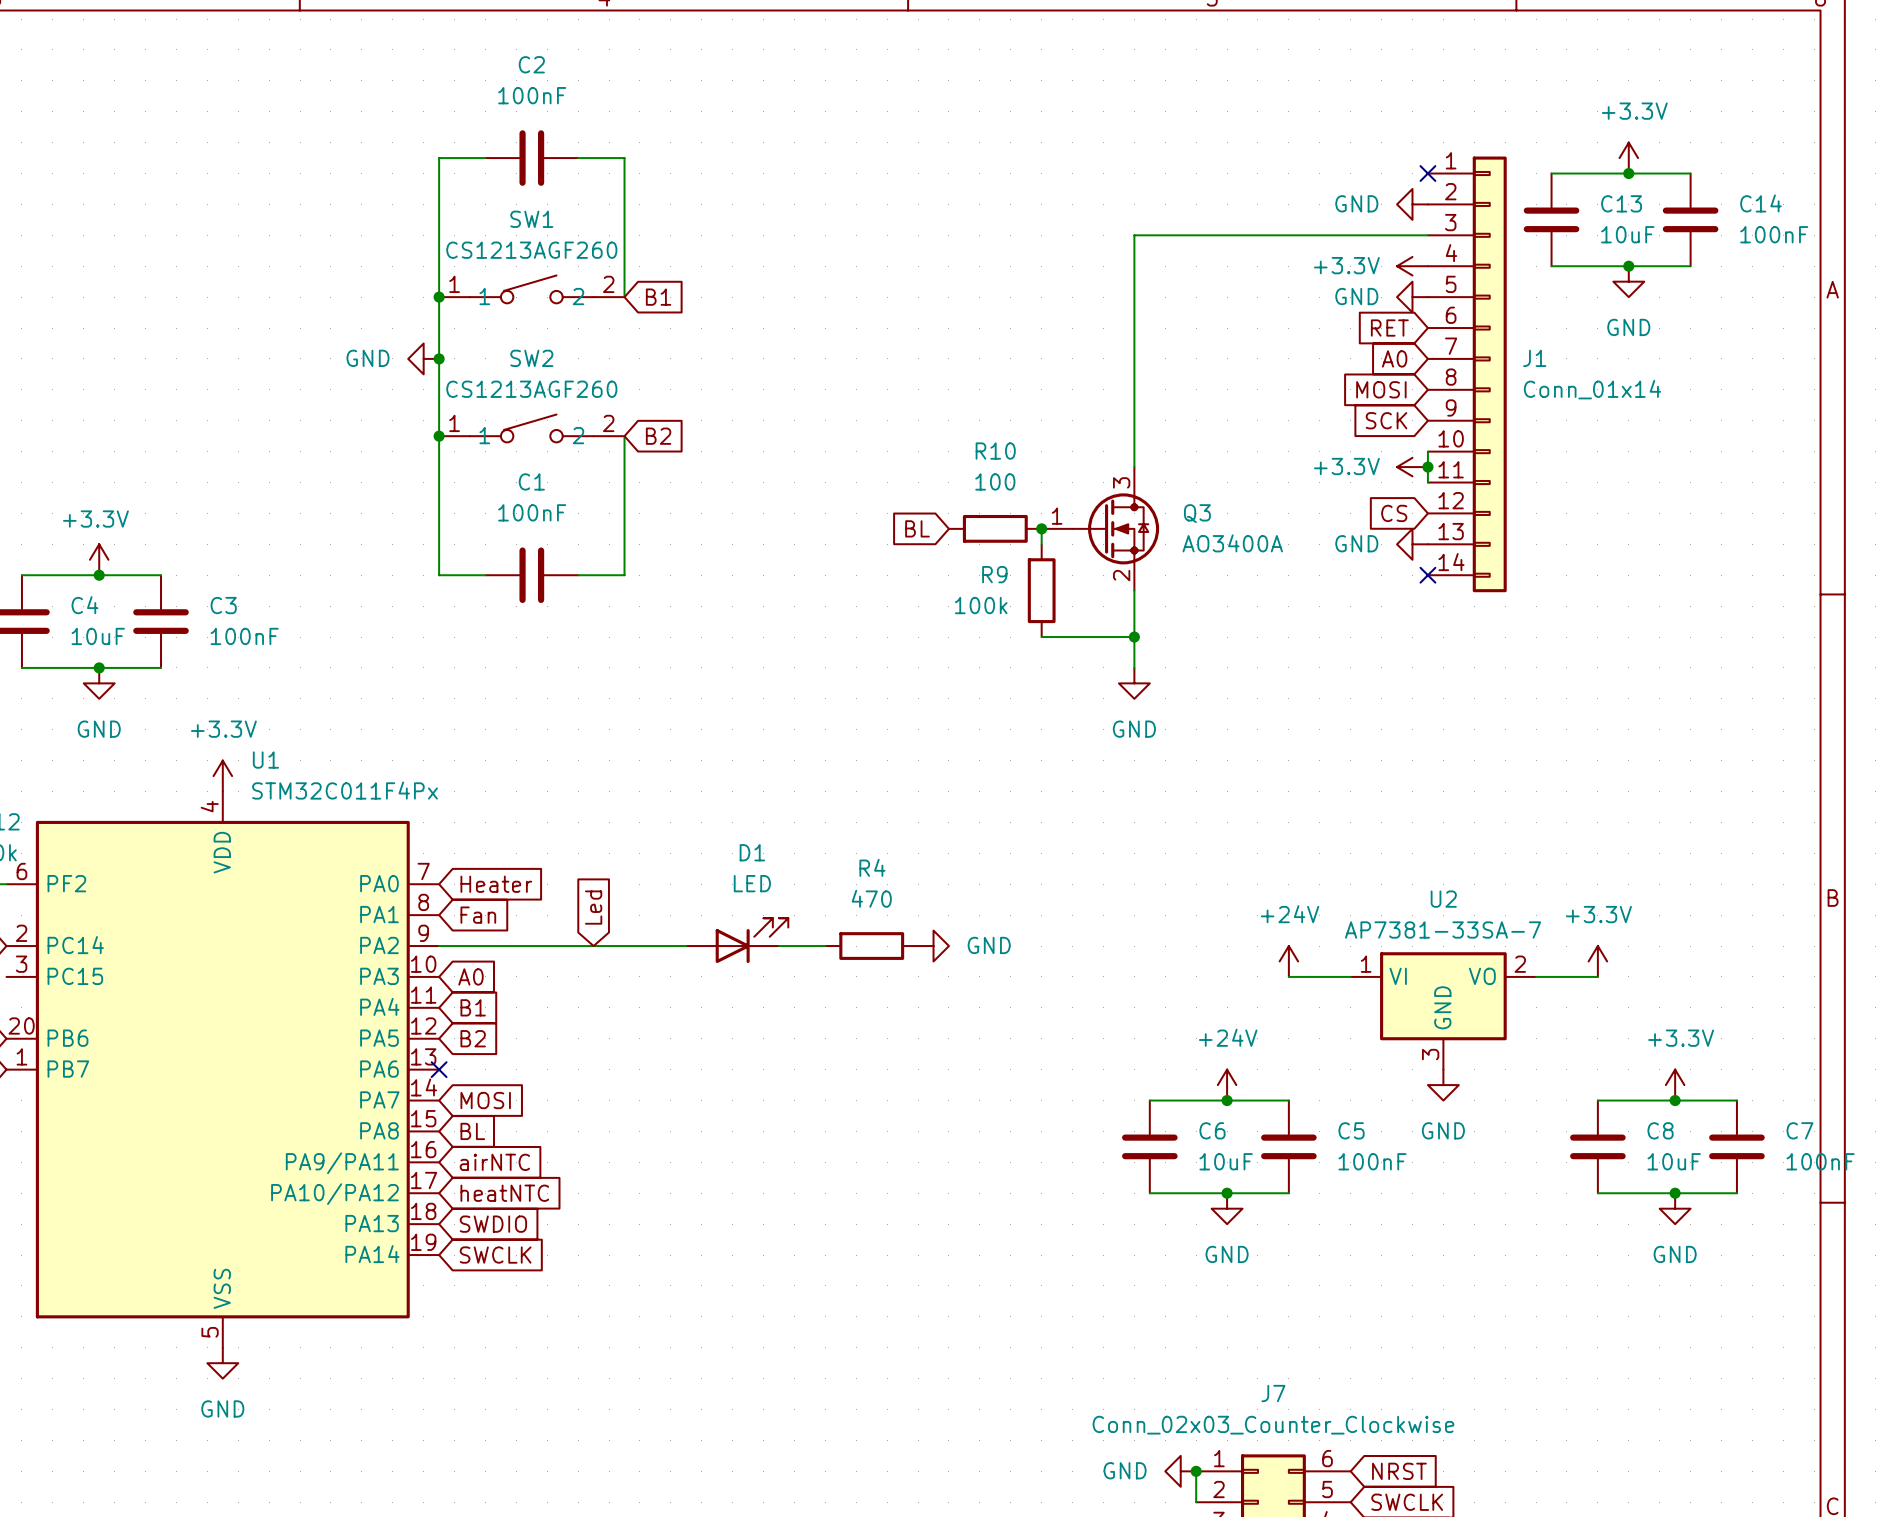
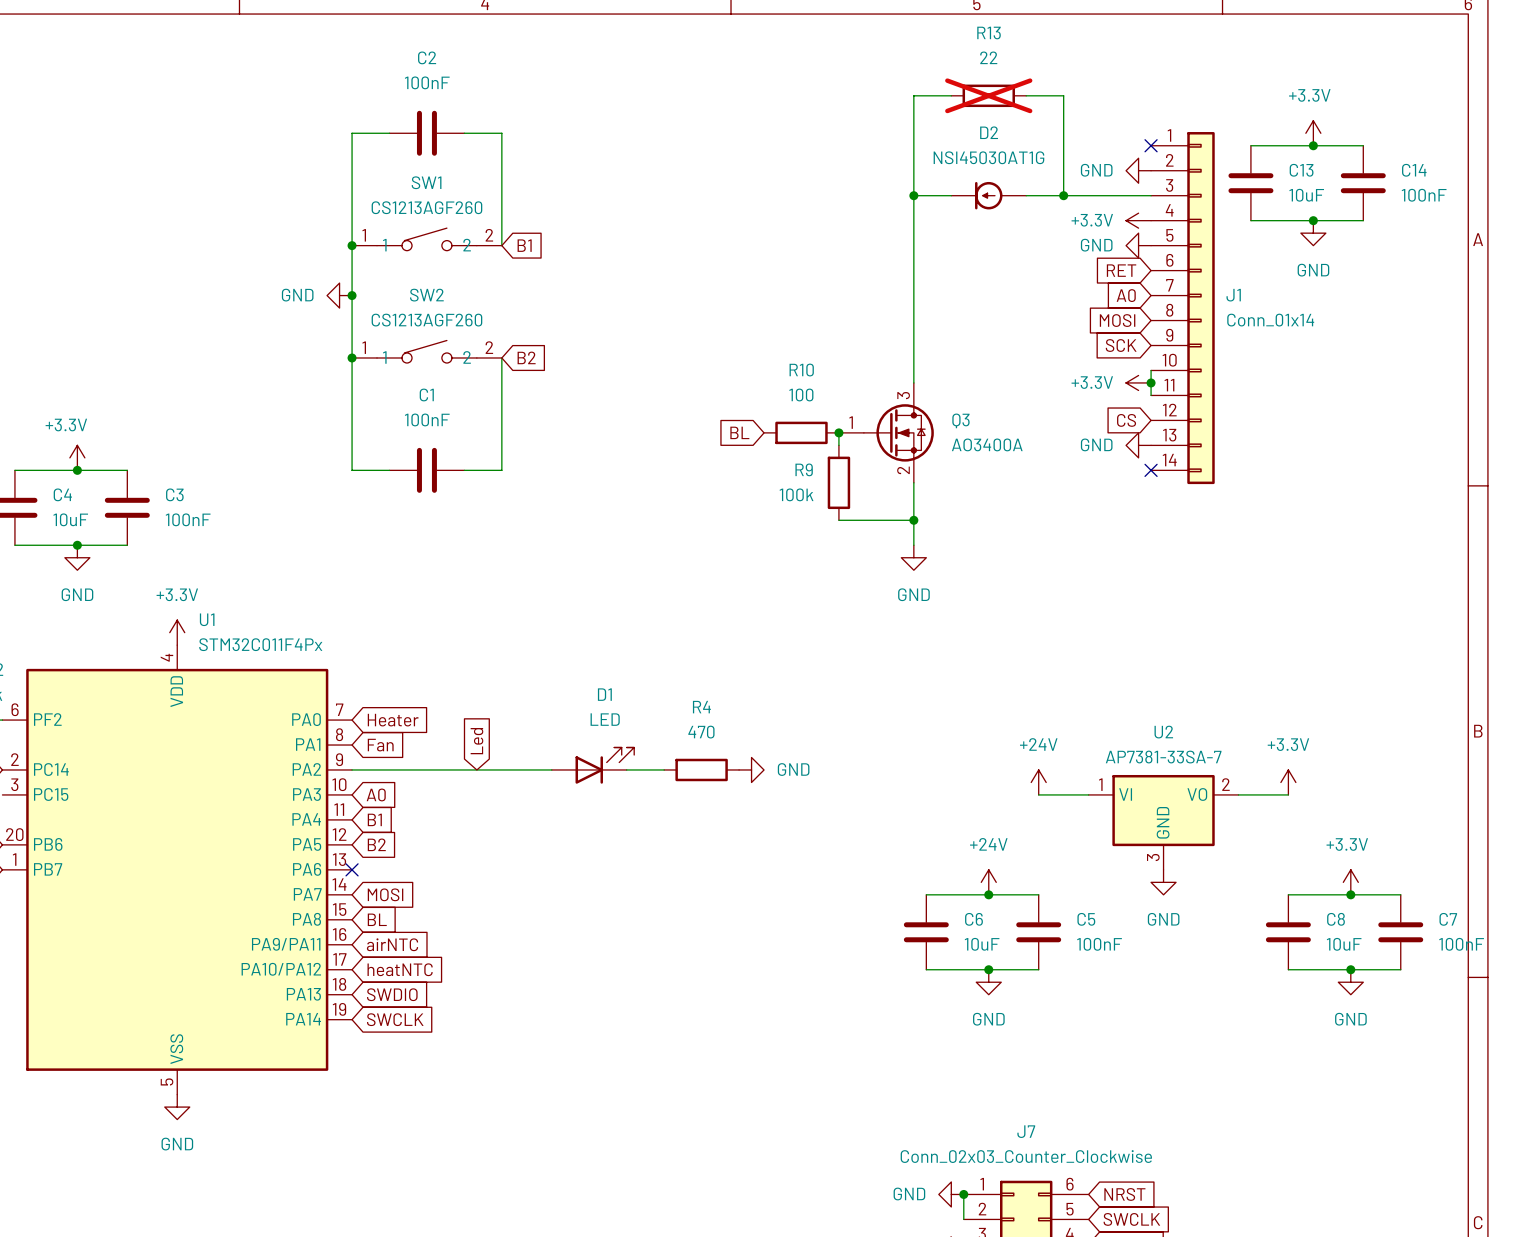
wire: none -> (951, 95) (913, 95) (913, 195)
R13: none -> 22 (988, 95)
wire: none -> (1026, 95) (1063, 95) (1063, 195)
junction: none -> (913, 195)
D2: none -> NSI45030AT1G (988, 195)
junction: none -> (1063, 195)

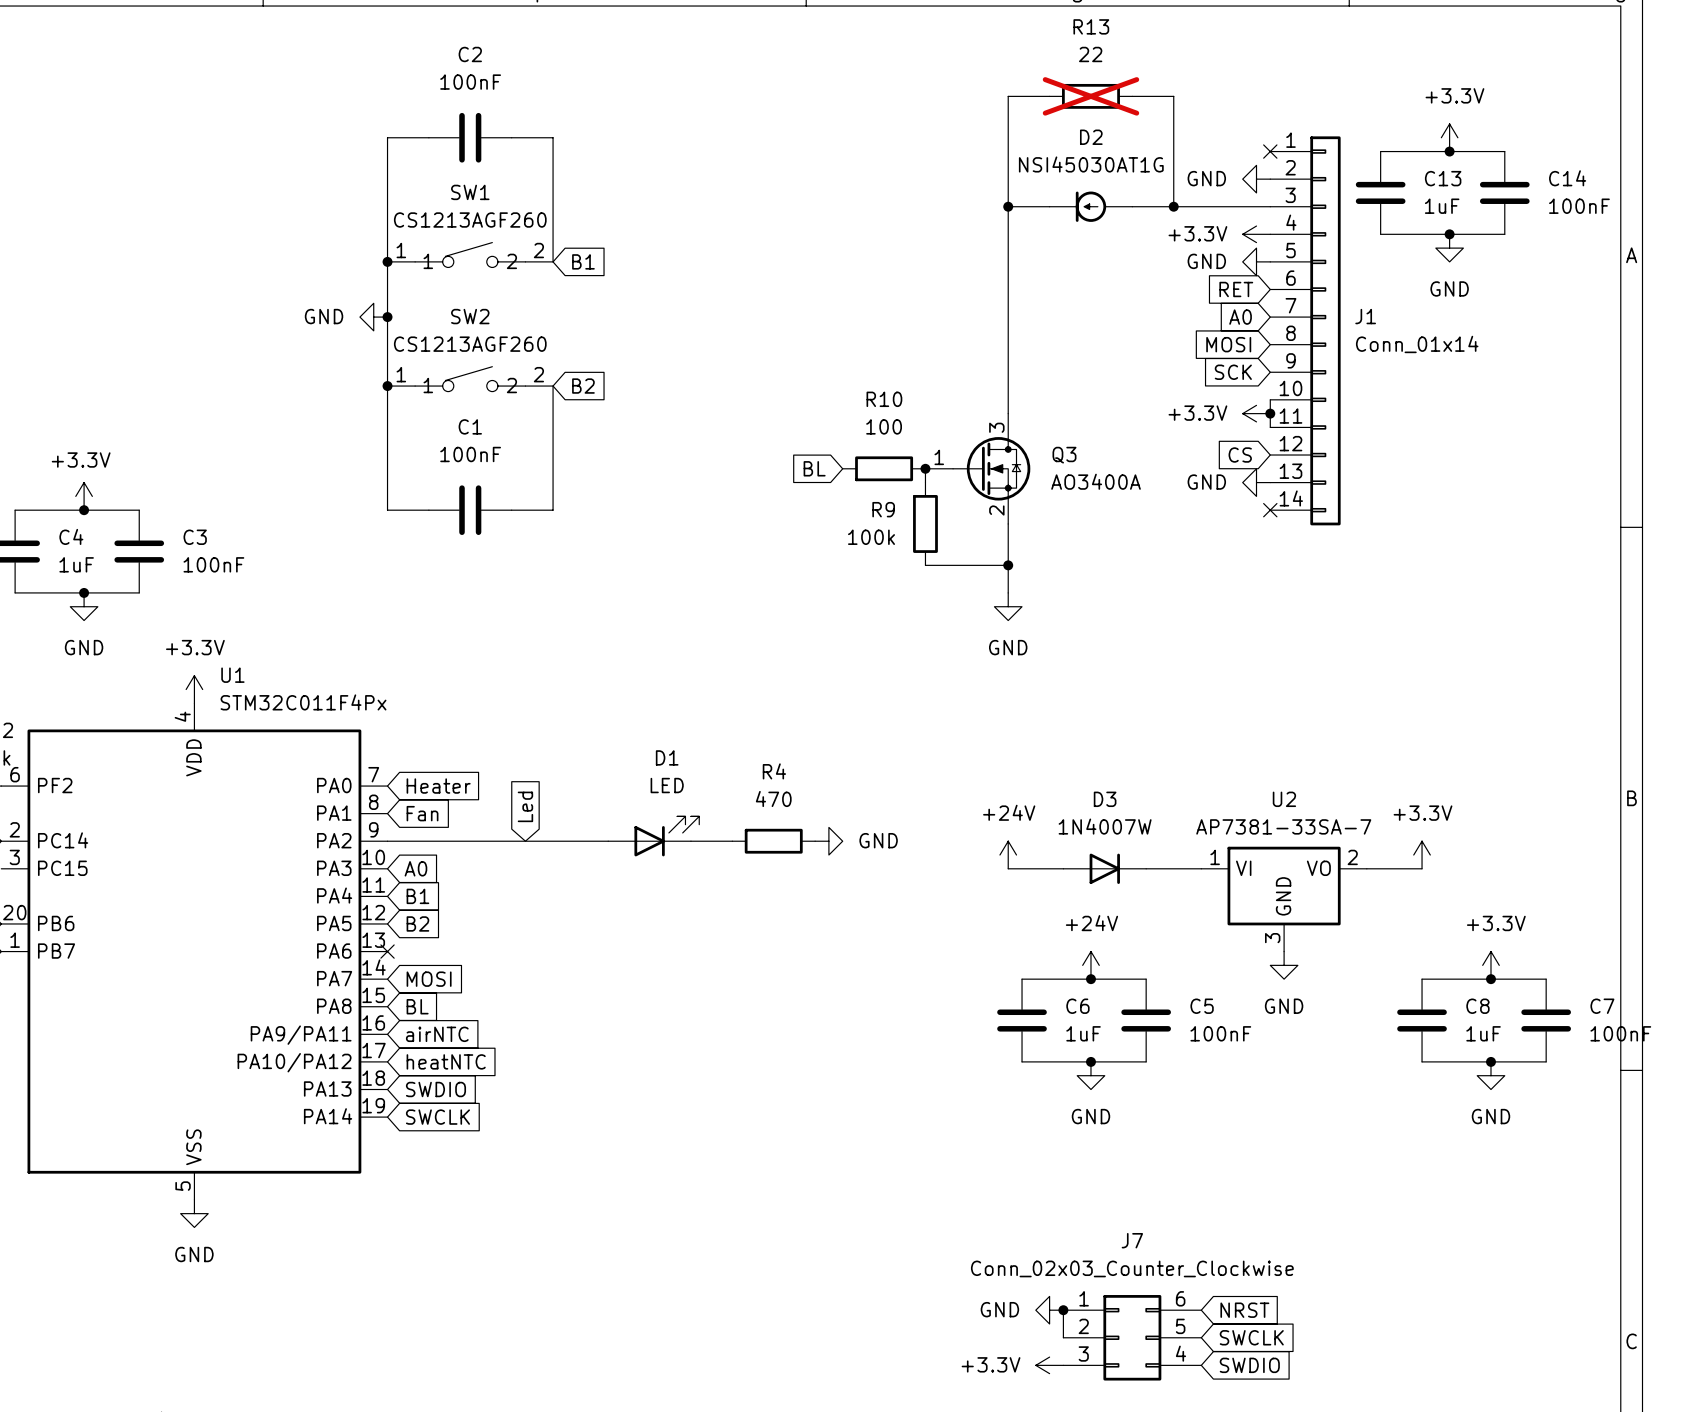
C13 value: 10uF (1306, 195) -> 1uF (1442, 206)
C4 value: 10uF (70, 519) -> 1uF (76, 564)
power symbol position: +24V (1038, 782) -> +24V (1008, 855)
wire: none -> (1008, 868) (1063, 868)
D3: none -> 1N4007W (1104, 868)
C6 value: 10uF (982, 944) -> 1uF (1083, 1033)
C8 value: 10uF (1344, 944) -> 1uF (1483, 1033)

